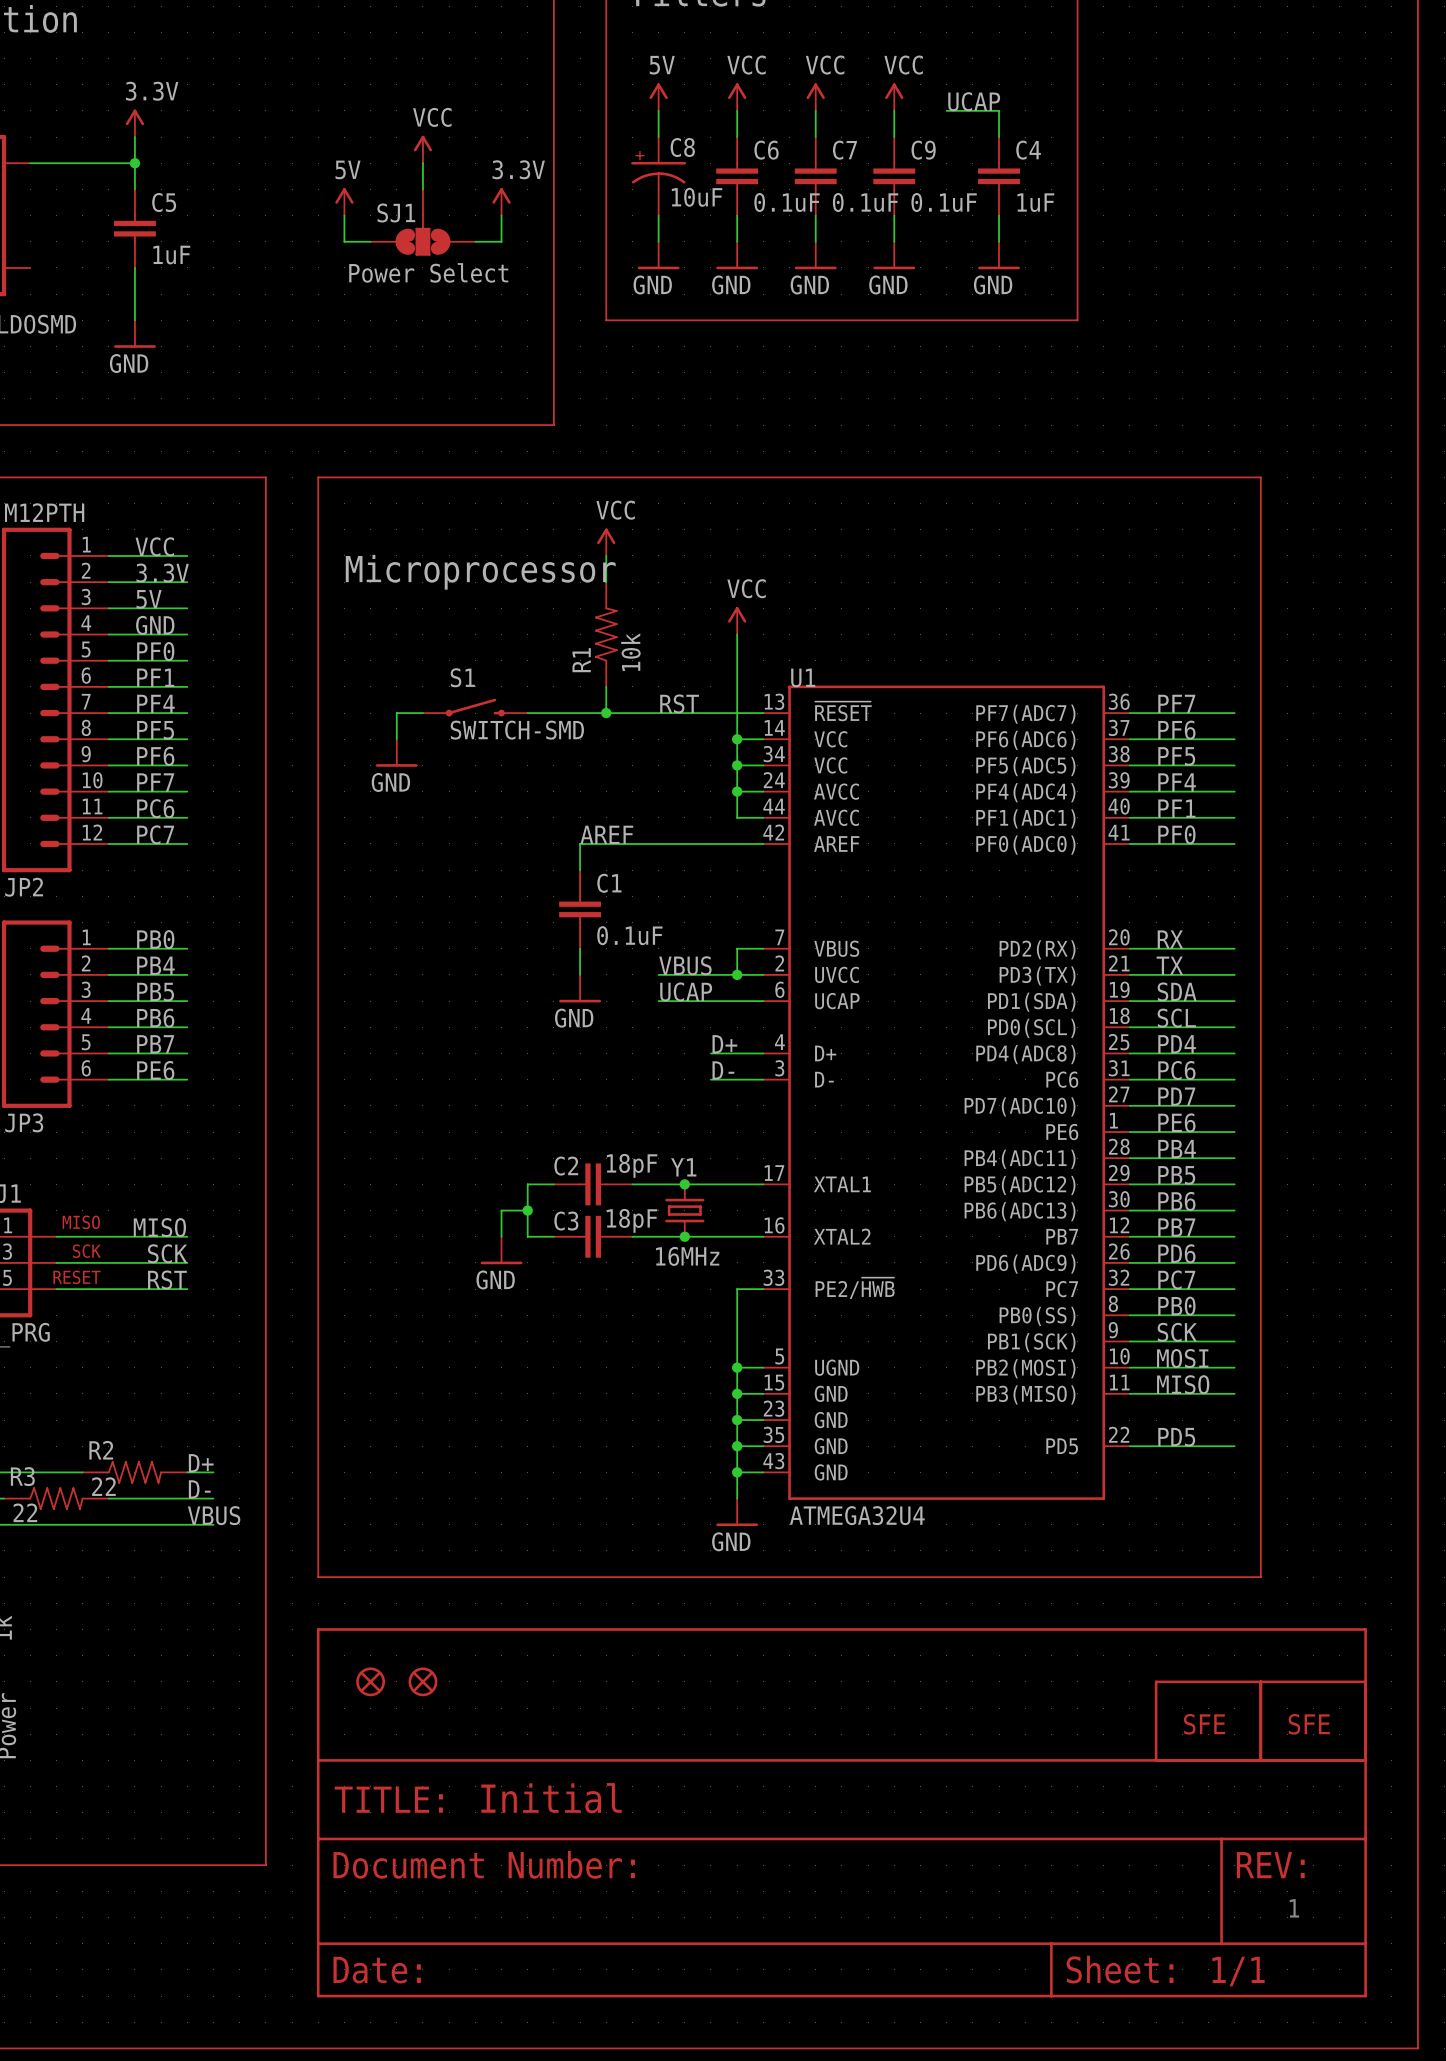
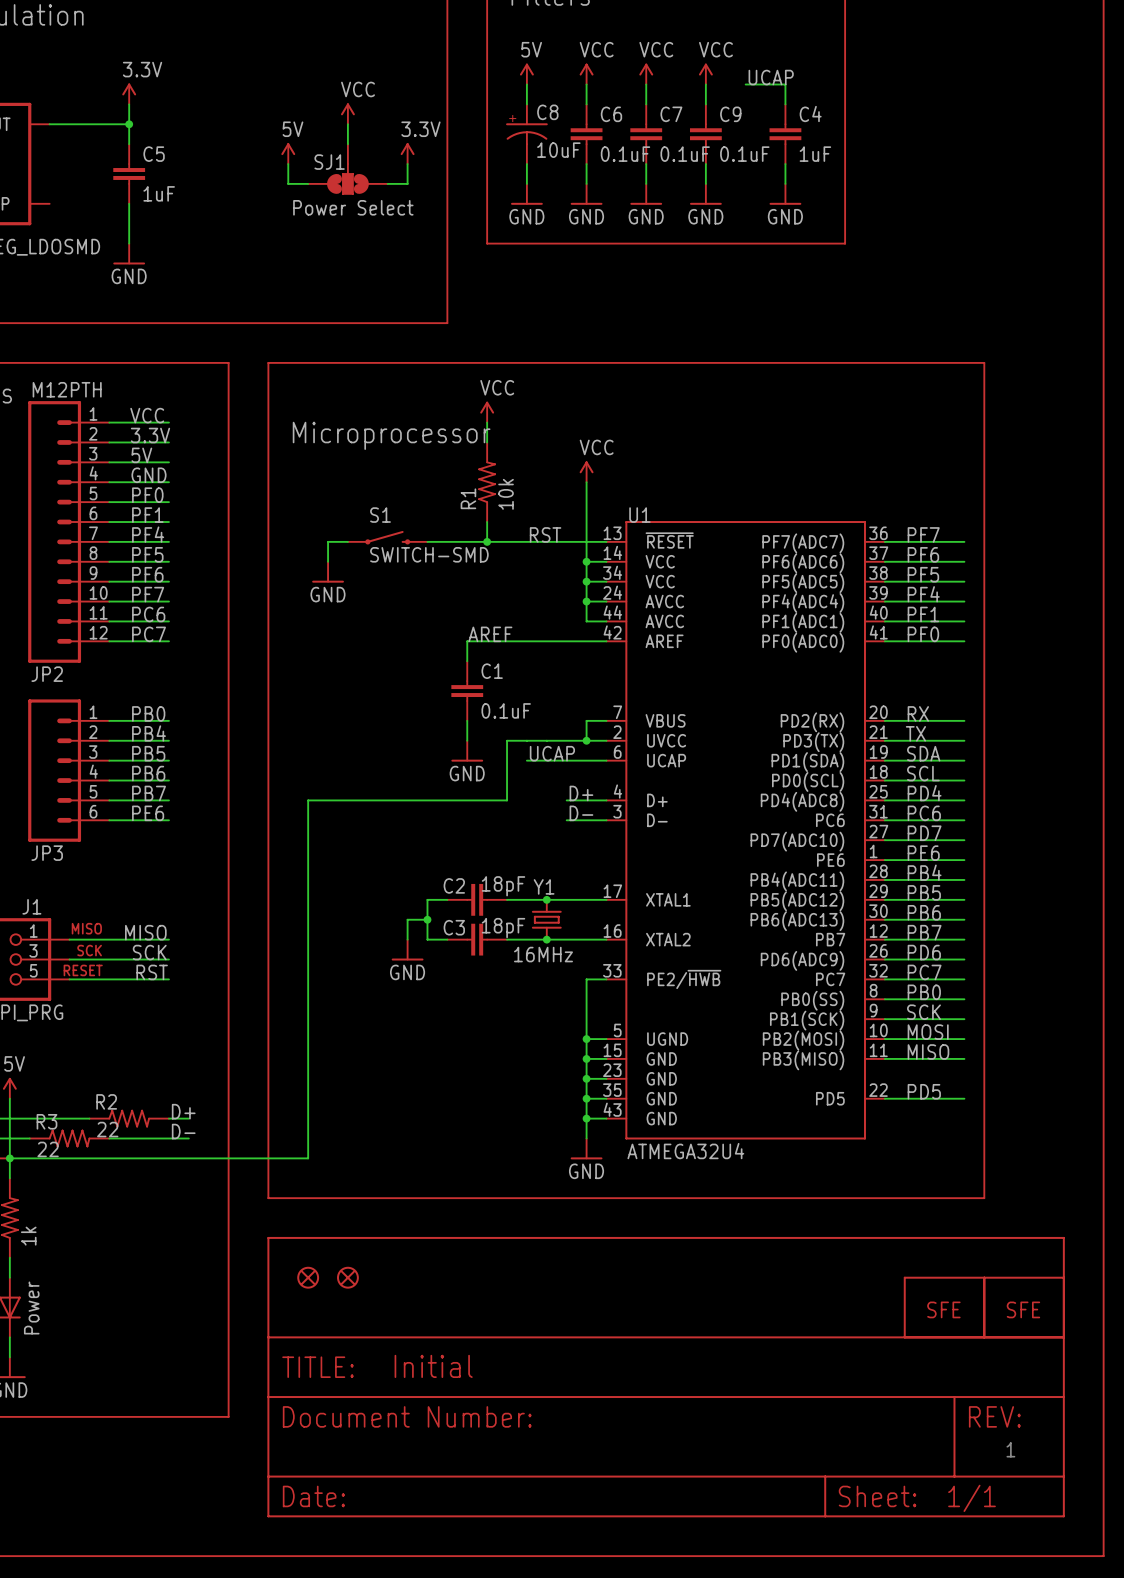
label: VBUS (685, 965) -> none
wire: none -> (526, 740) (507, 740) (507, 800) (308, 800) (308, 1158) (188, 1158)
label: VBUS (214, 1515) -> none

